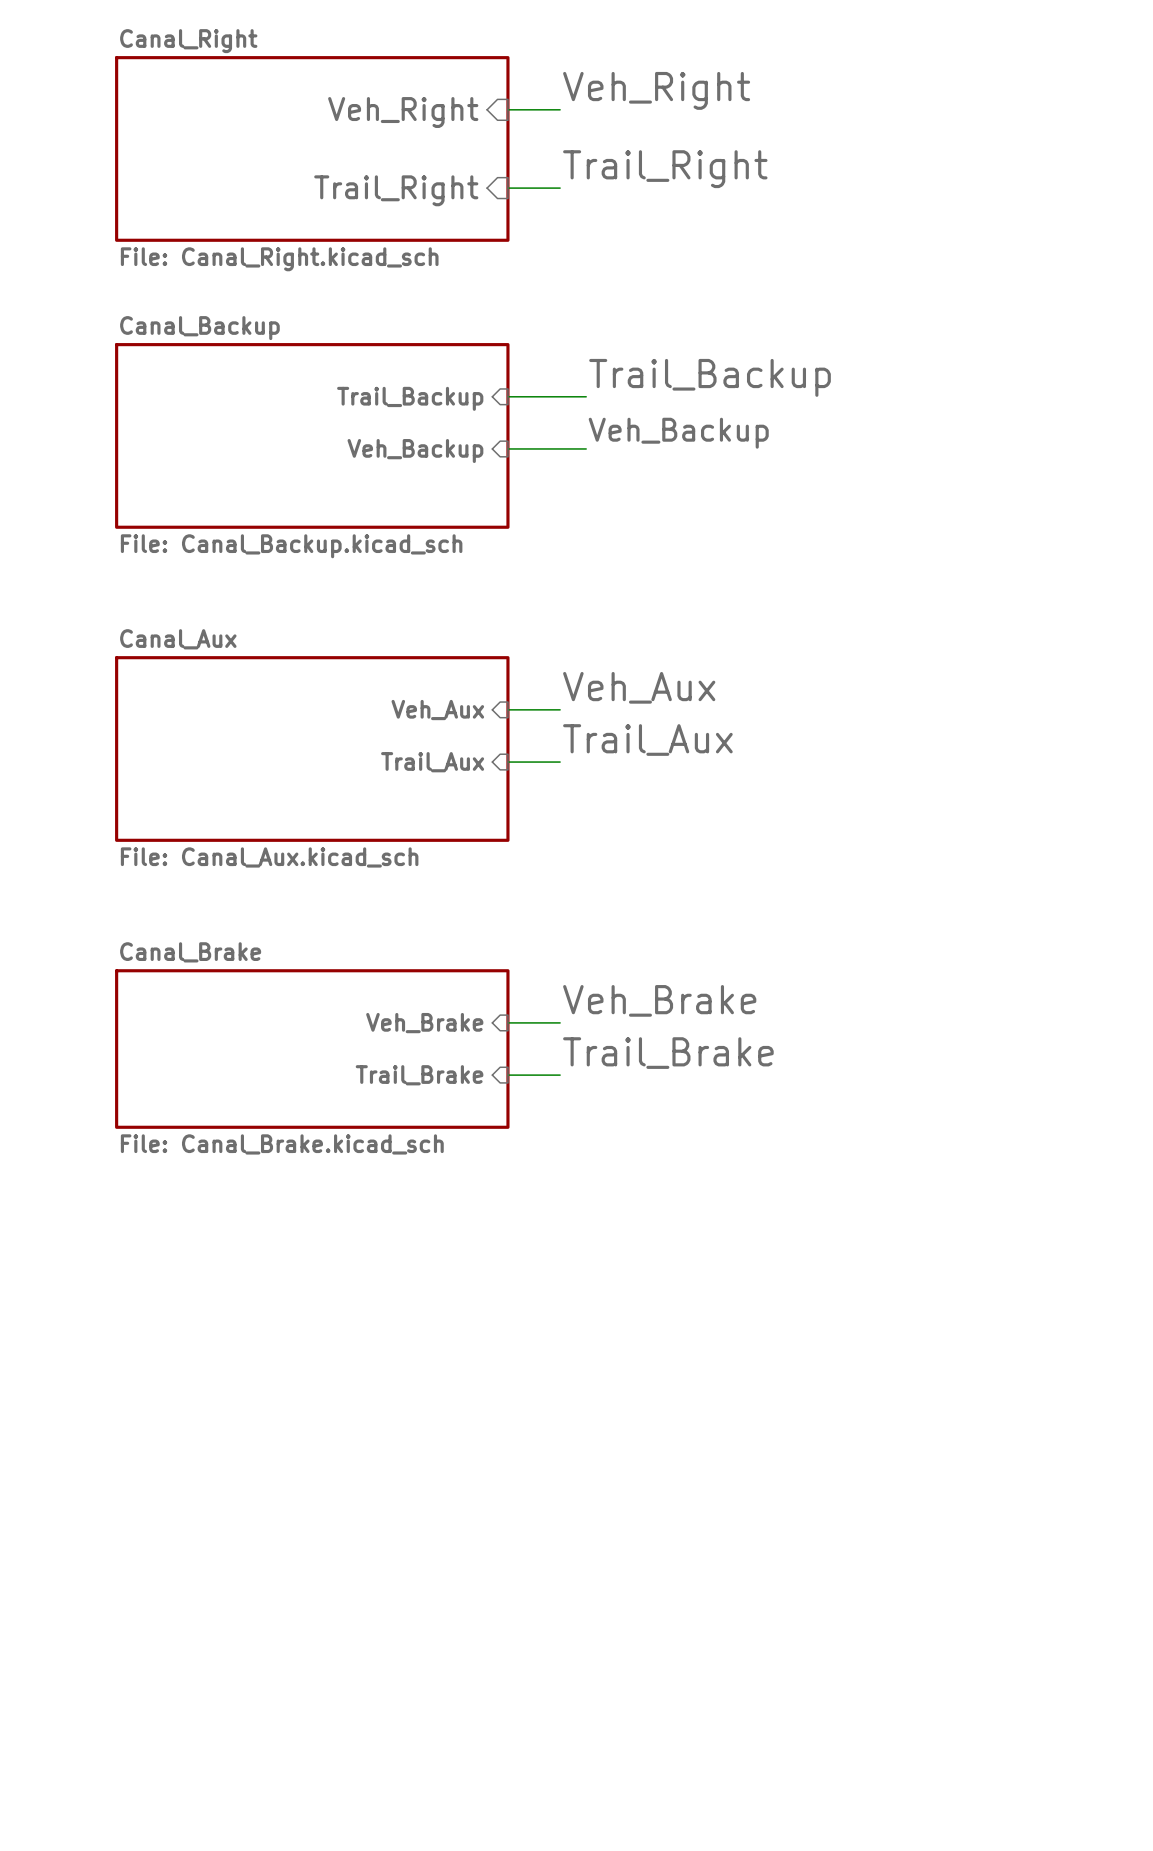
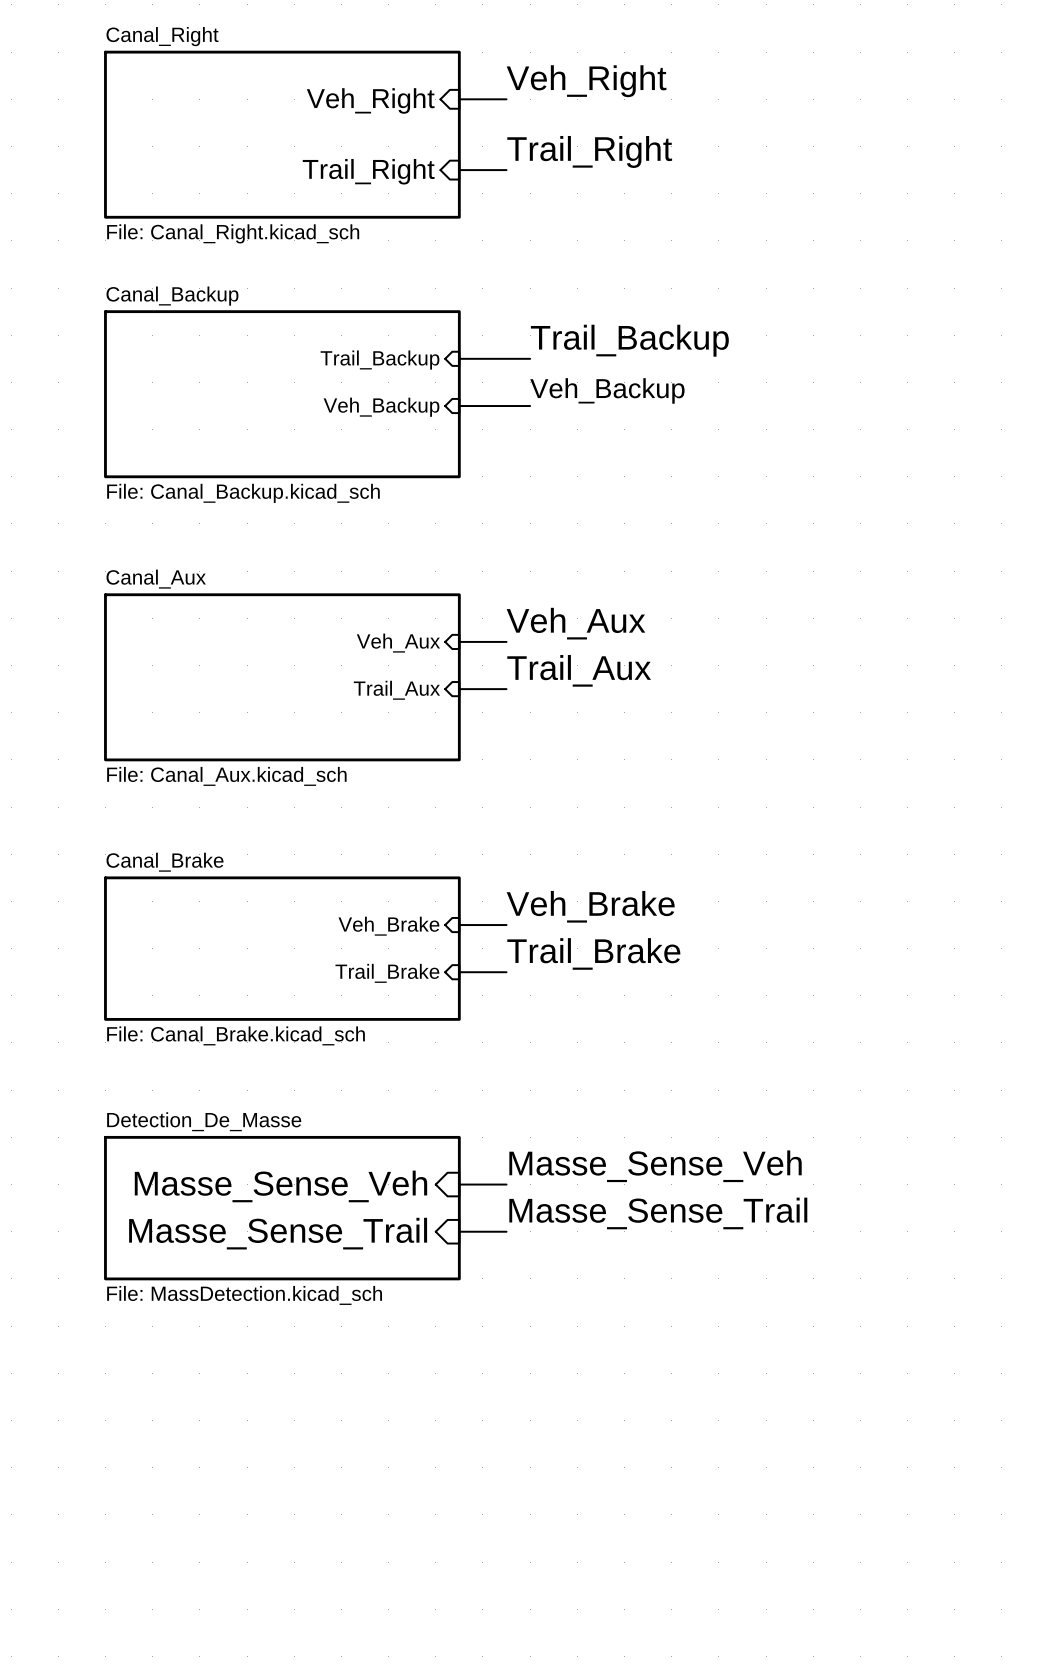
label: none -> Masse_Sense_Veh (655, 1166)
wire: none -> (459, 1184) (506, 1184)
sheet pin: none -> Masse_Sense_Veh (280, 1186)
sheet Detection_De_Masse: none -> File: MassDetection.kicad_sch (282, 1208)
label: none -> Masse_Sense_Trail (658, 1213)
sheet pin: none -> Masse_Sense_Trail (278, 1233)
wire: none -> (459, 1231) (506, 1231)

